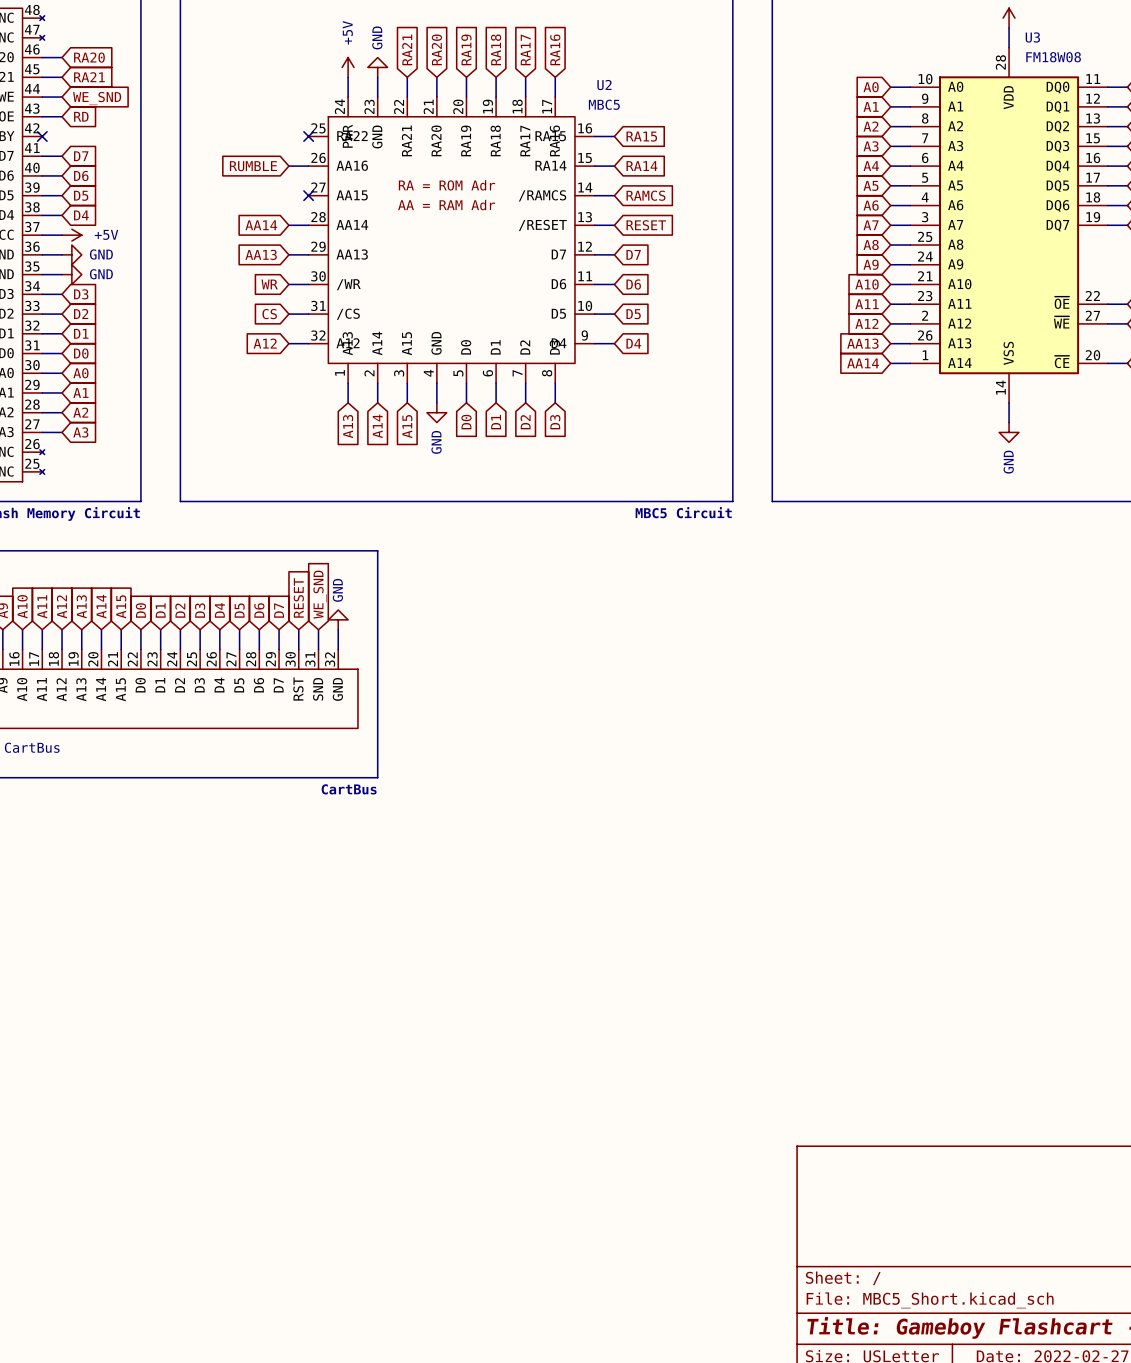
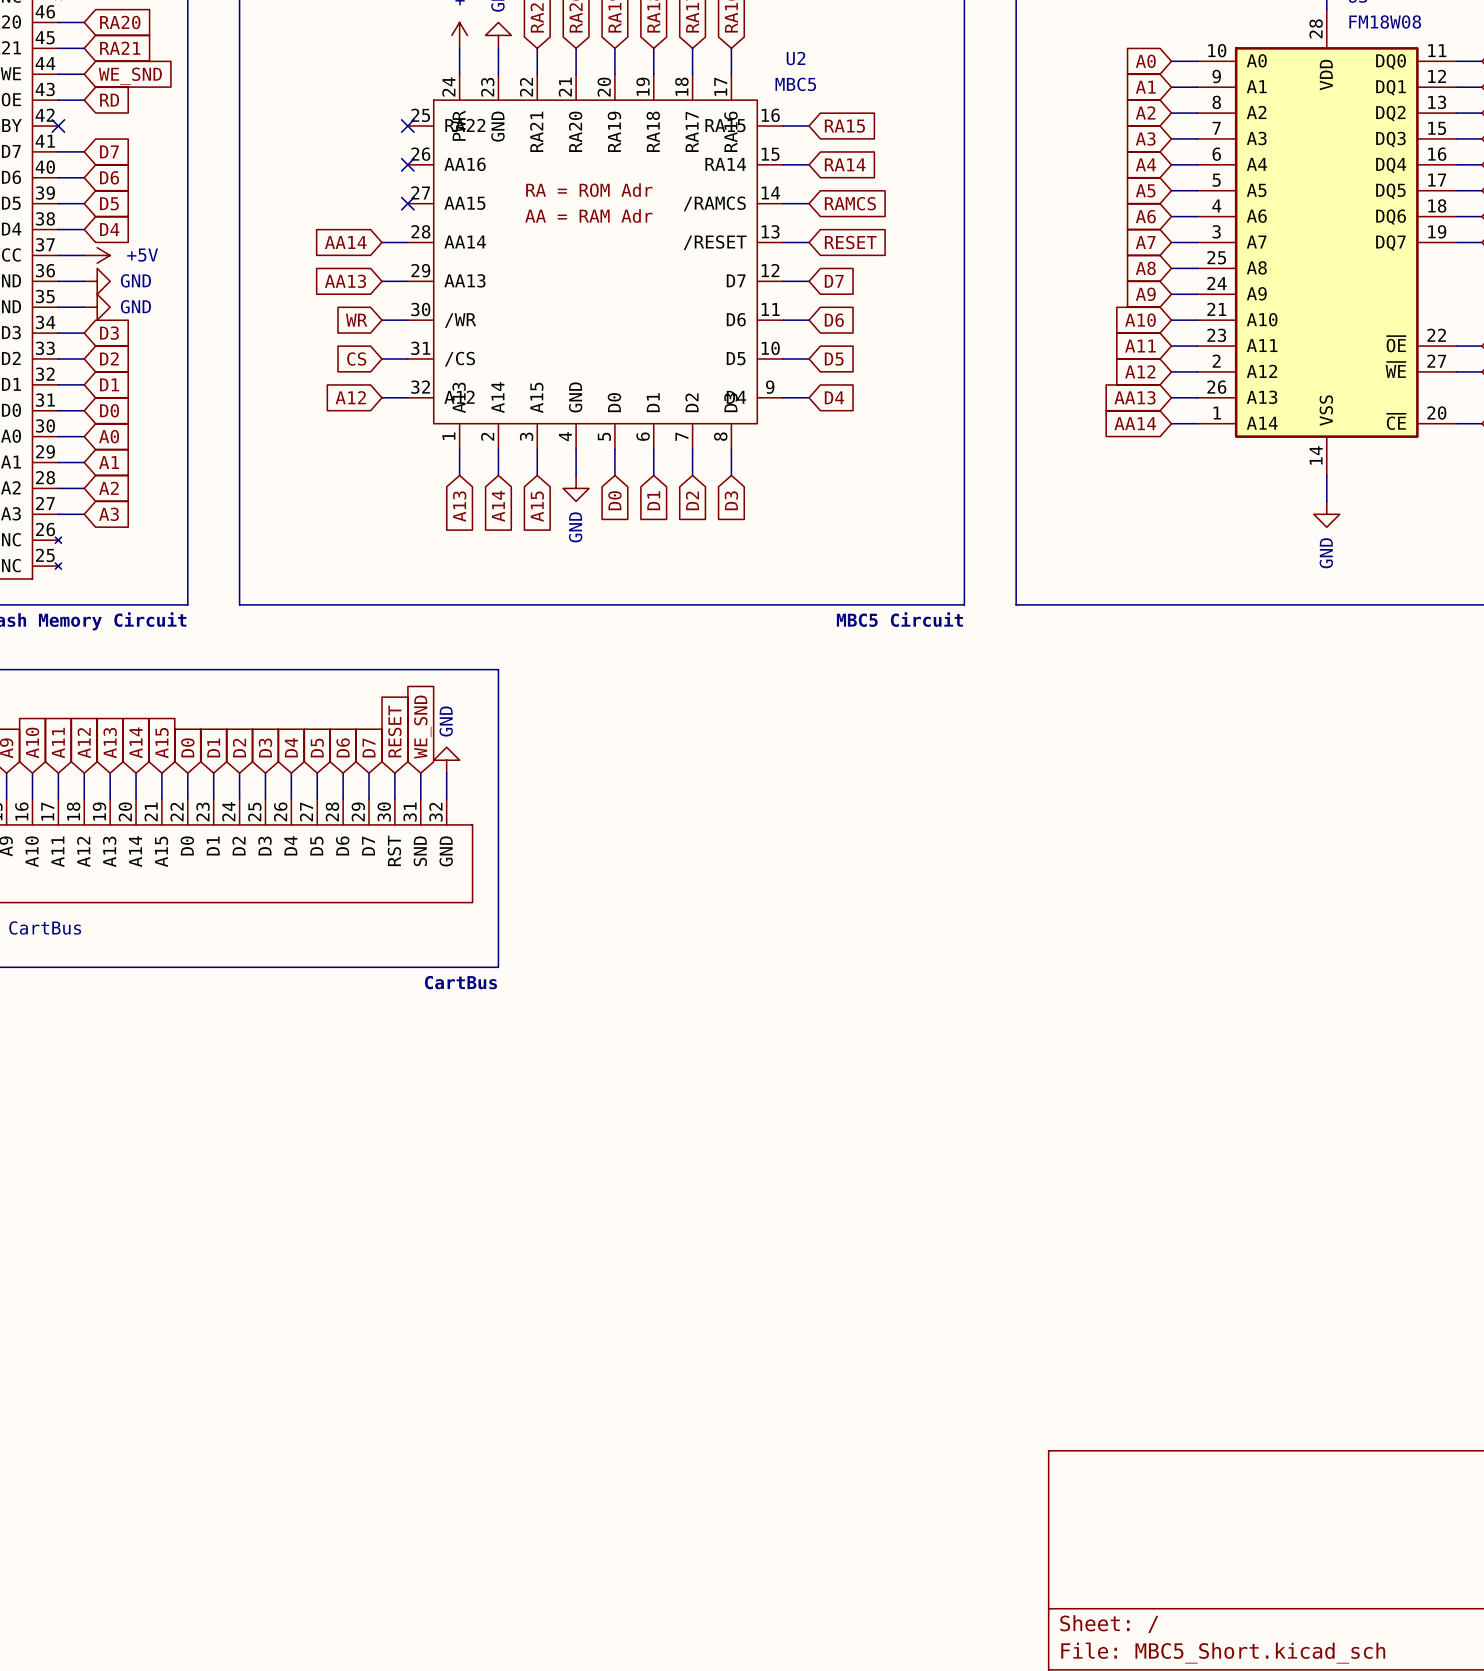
global label: RUMBLE (253, 166) -> none
wire: (288, 166) (308, 166) -> none
no-connect mark: none -> (407, 164)

